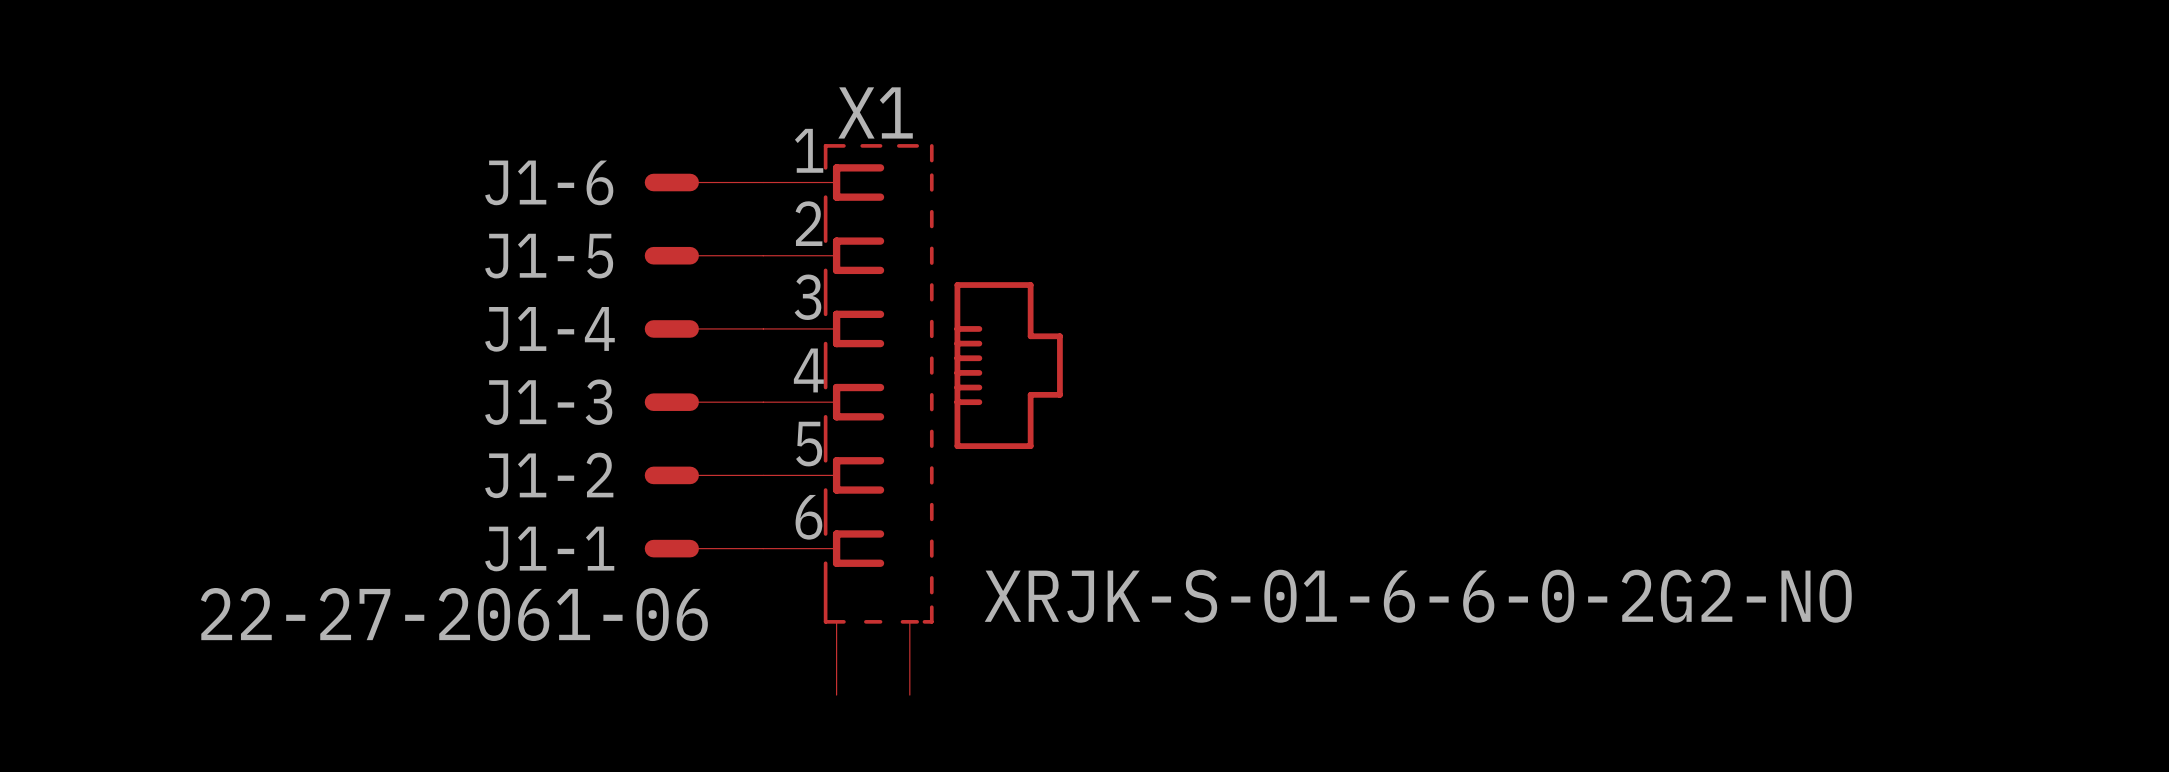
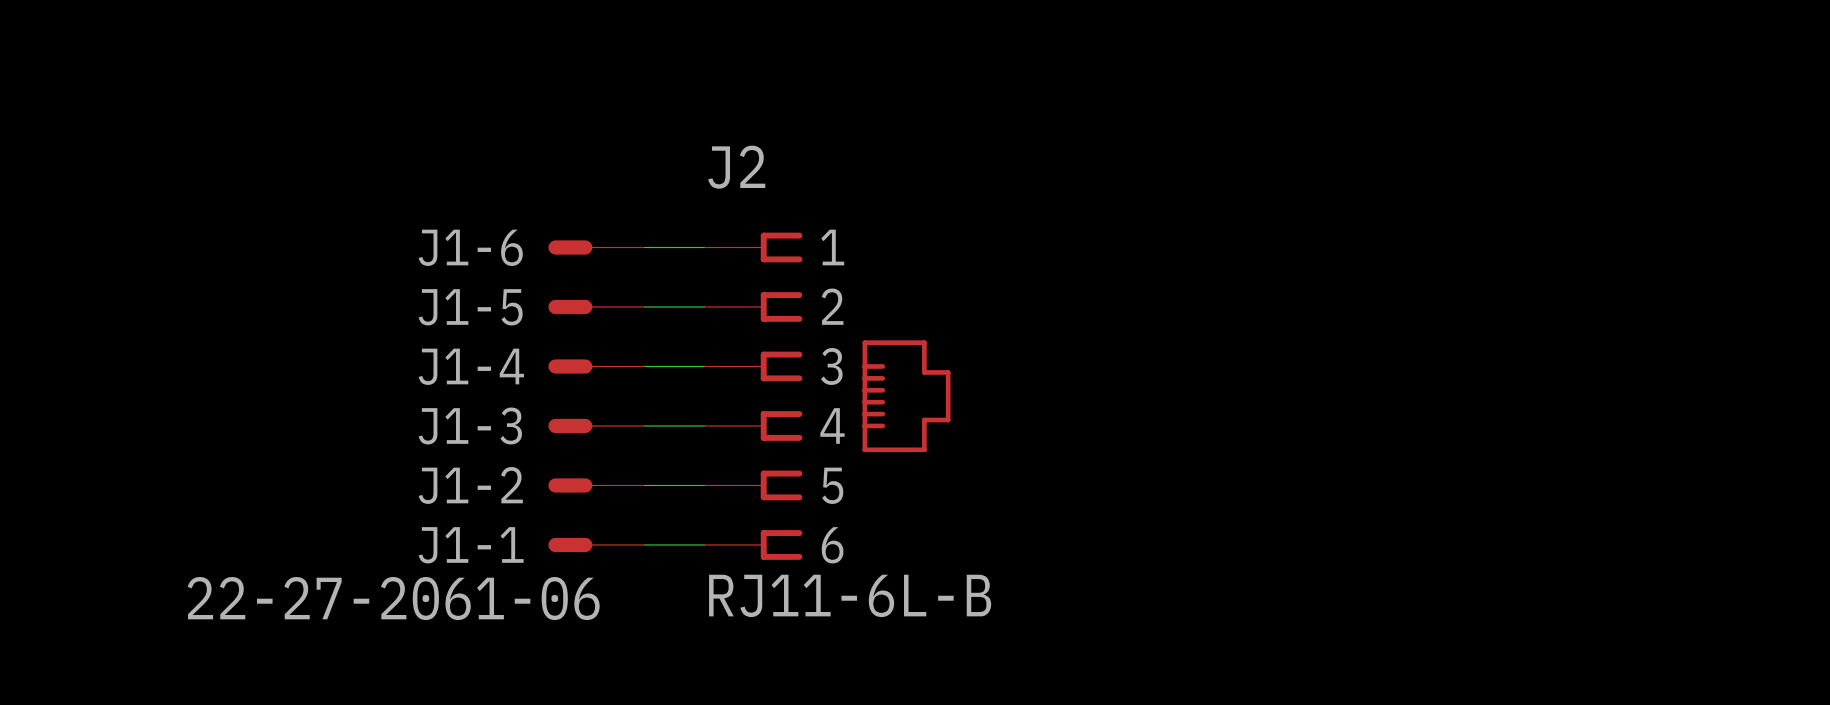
J2: none -> RJ11-6L-B (827, 396)
X1: XRJK-S-01-6-6-0-2G2-NO (913, 419) -> none

